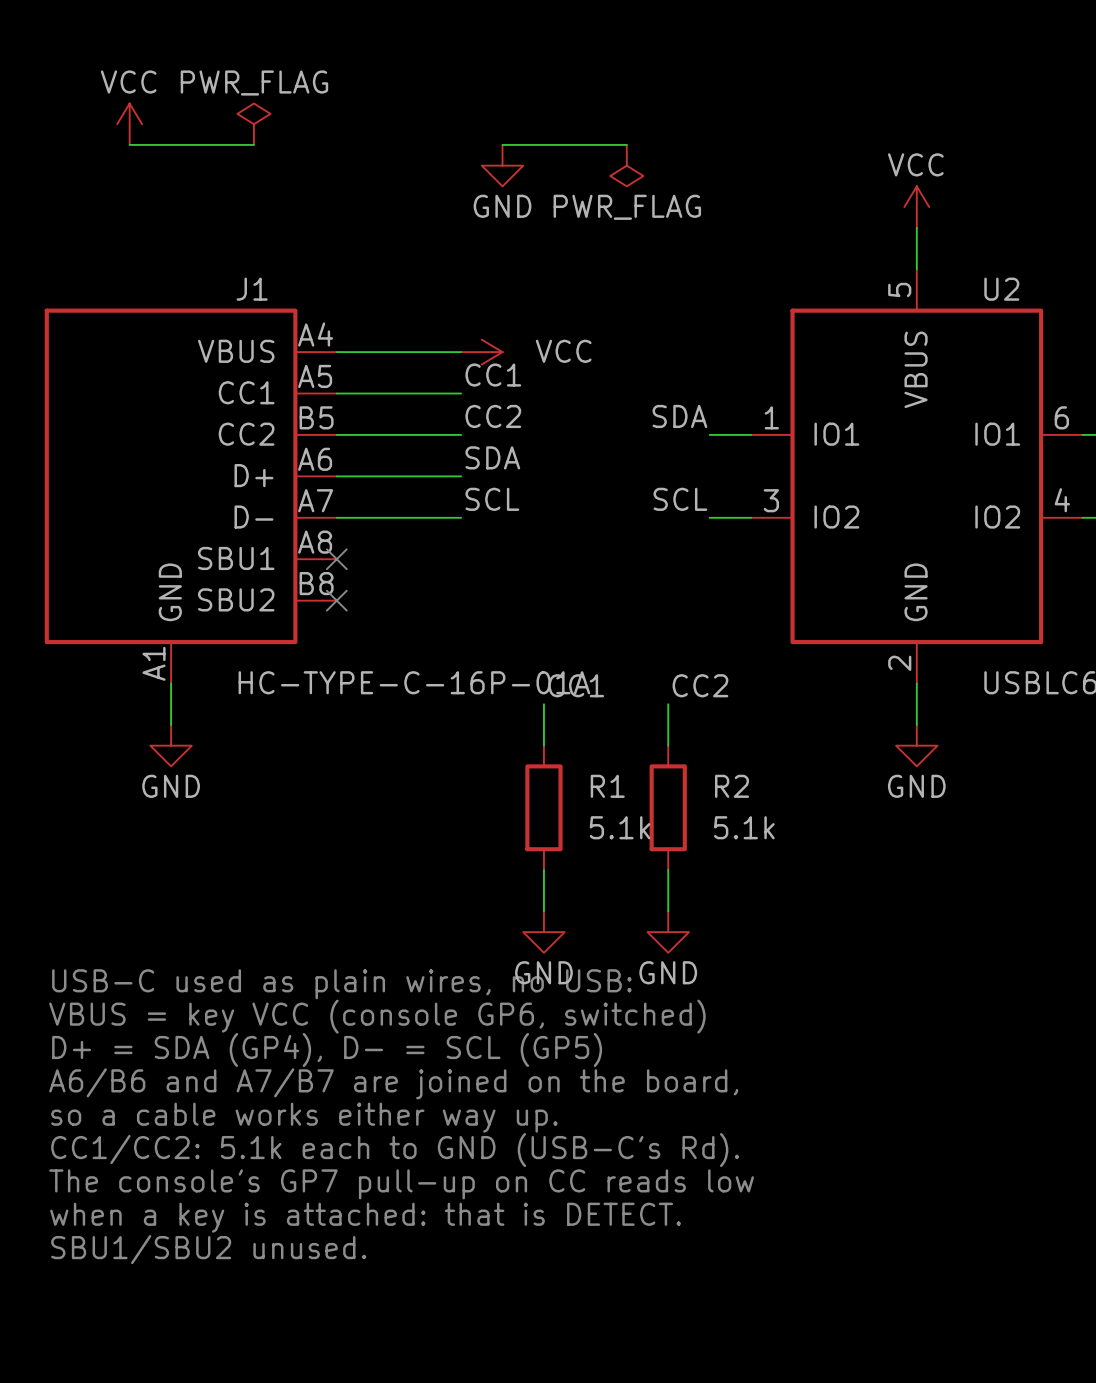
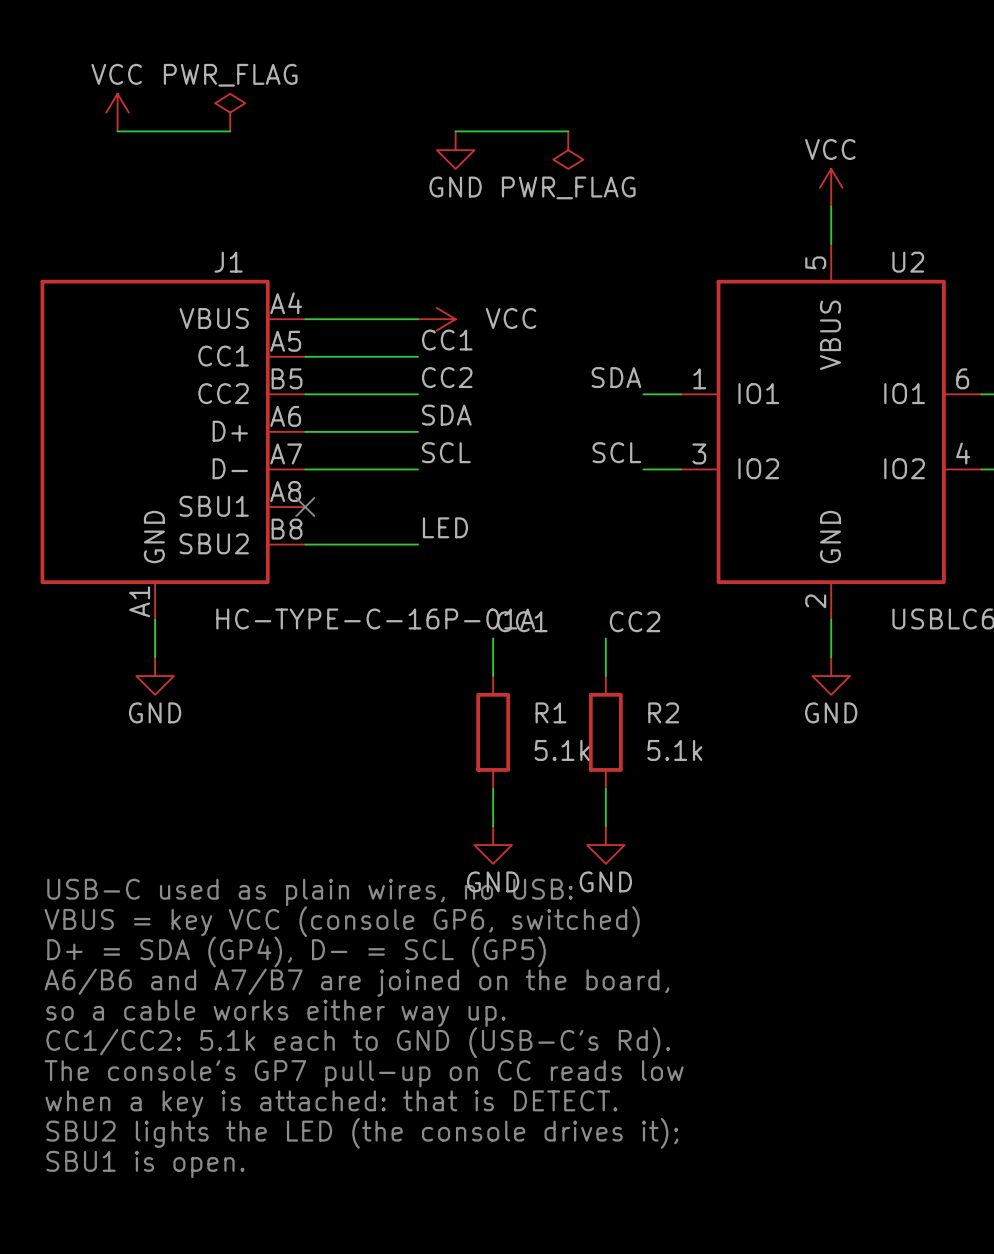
label: none -> LED (445, 527)
wire: none -> (305, 544) (418, 544)
no-connect mark: (336, 600) -> none
text: SBU1/SBU2 unused. (208, 1249) -> SBU2 lights the LED (the console drives it); (362, 1133)
text: none -> SBU1 is open. (145, 1164)

